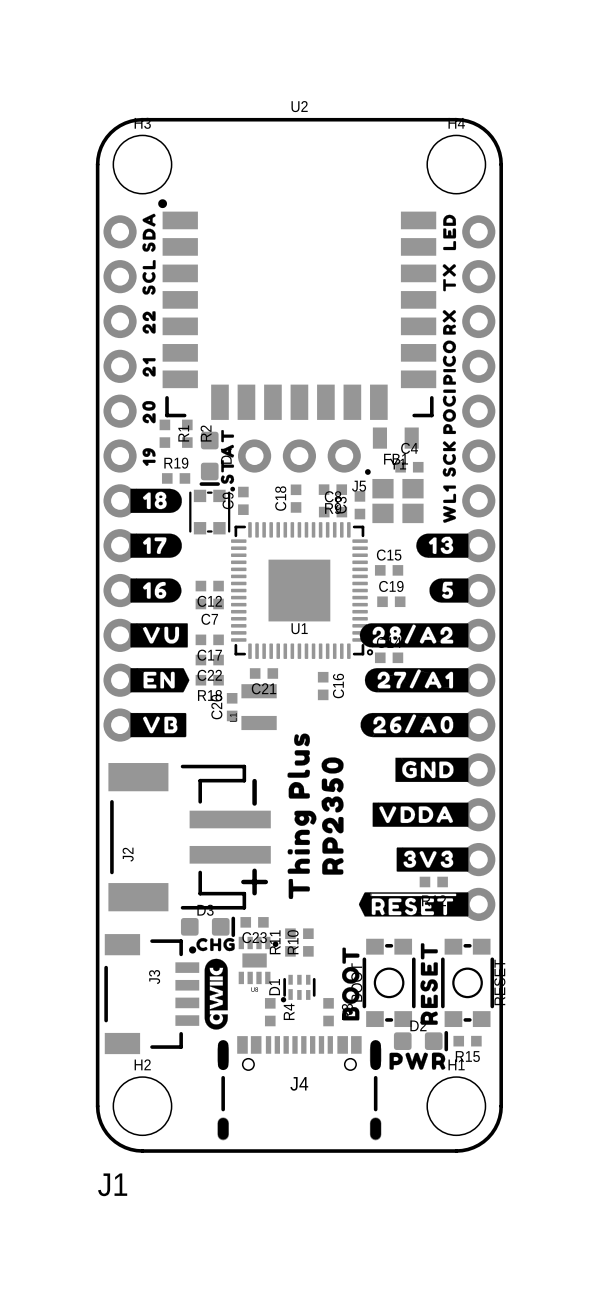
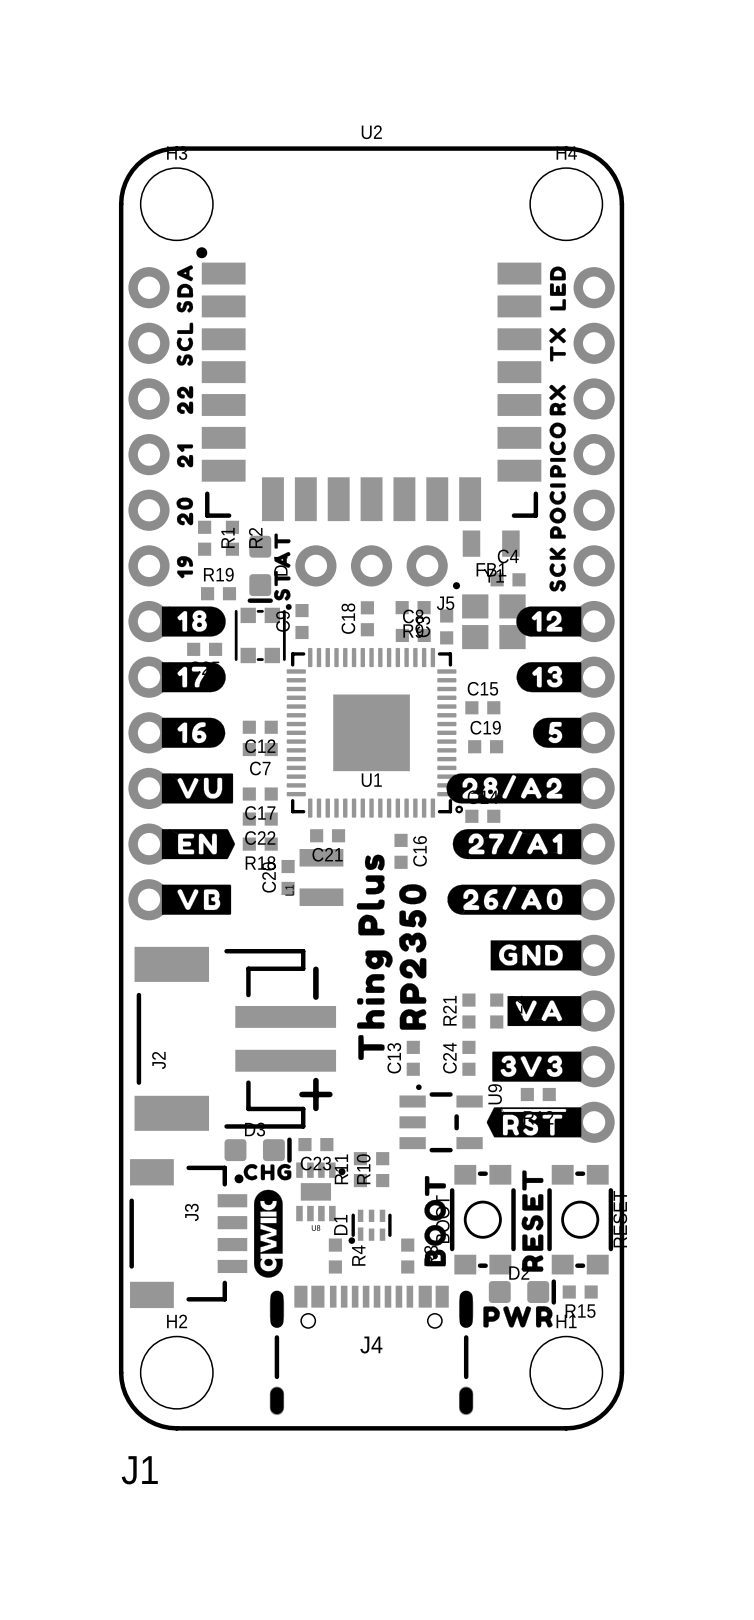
drawing shape: [443, 485, 457, 523] -> [516, 606, 582, 637]
part: none -> (204, 649)
drawing: [372, 802, 469, 827] -> none
drawing: none -> [507, 996, 582, 1027]
R21: none -> (468, 1011)
part: none -> (496, 1011)
drawing position: (301, 816) -> (374, 957)
drawing position: (332, 816) -> (412, 957)
C13: none -> (413, 1058)
C24: none -> (468, 1058)
drawing shape: [358, 892, 469, 917] -> [486, 1107, 582, 1138]
U9: none -> (441, 1118)

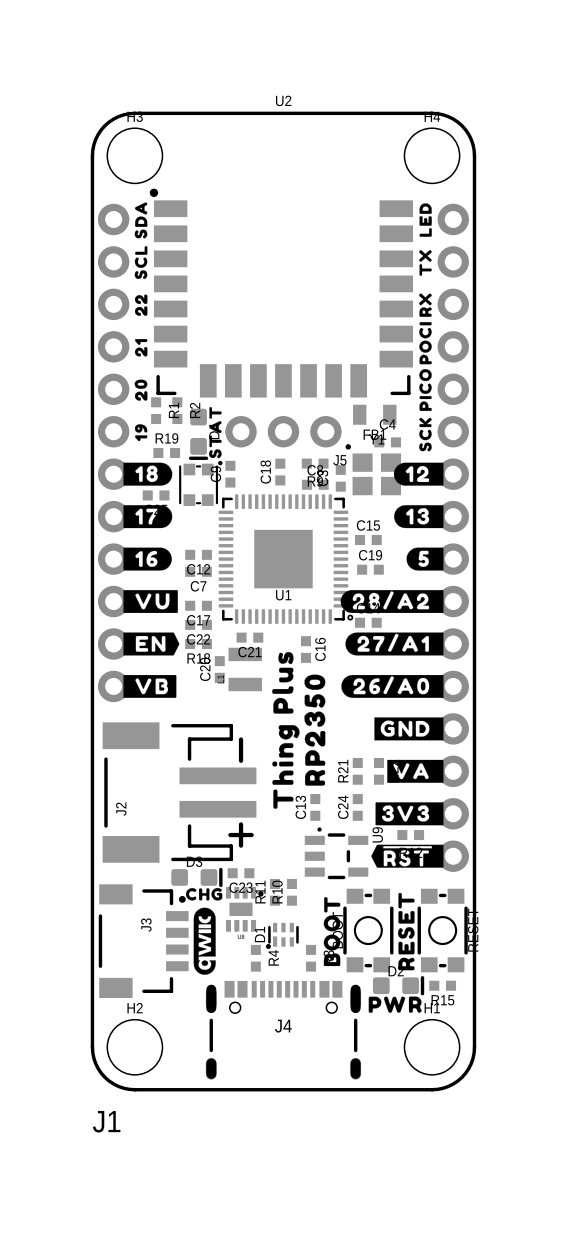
drawing position: (557, 450) -> (425, 390)
drawing position: (557, 511) -> (425, 343)

